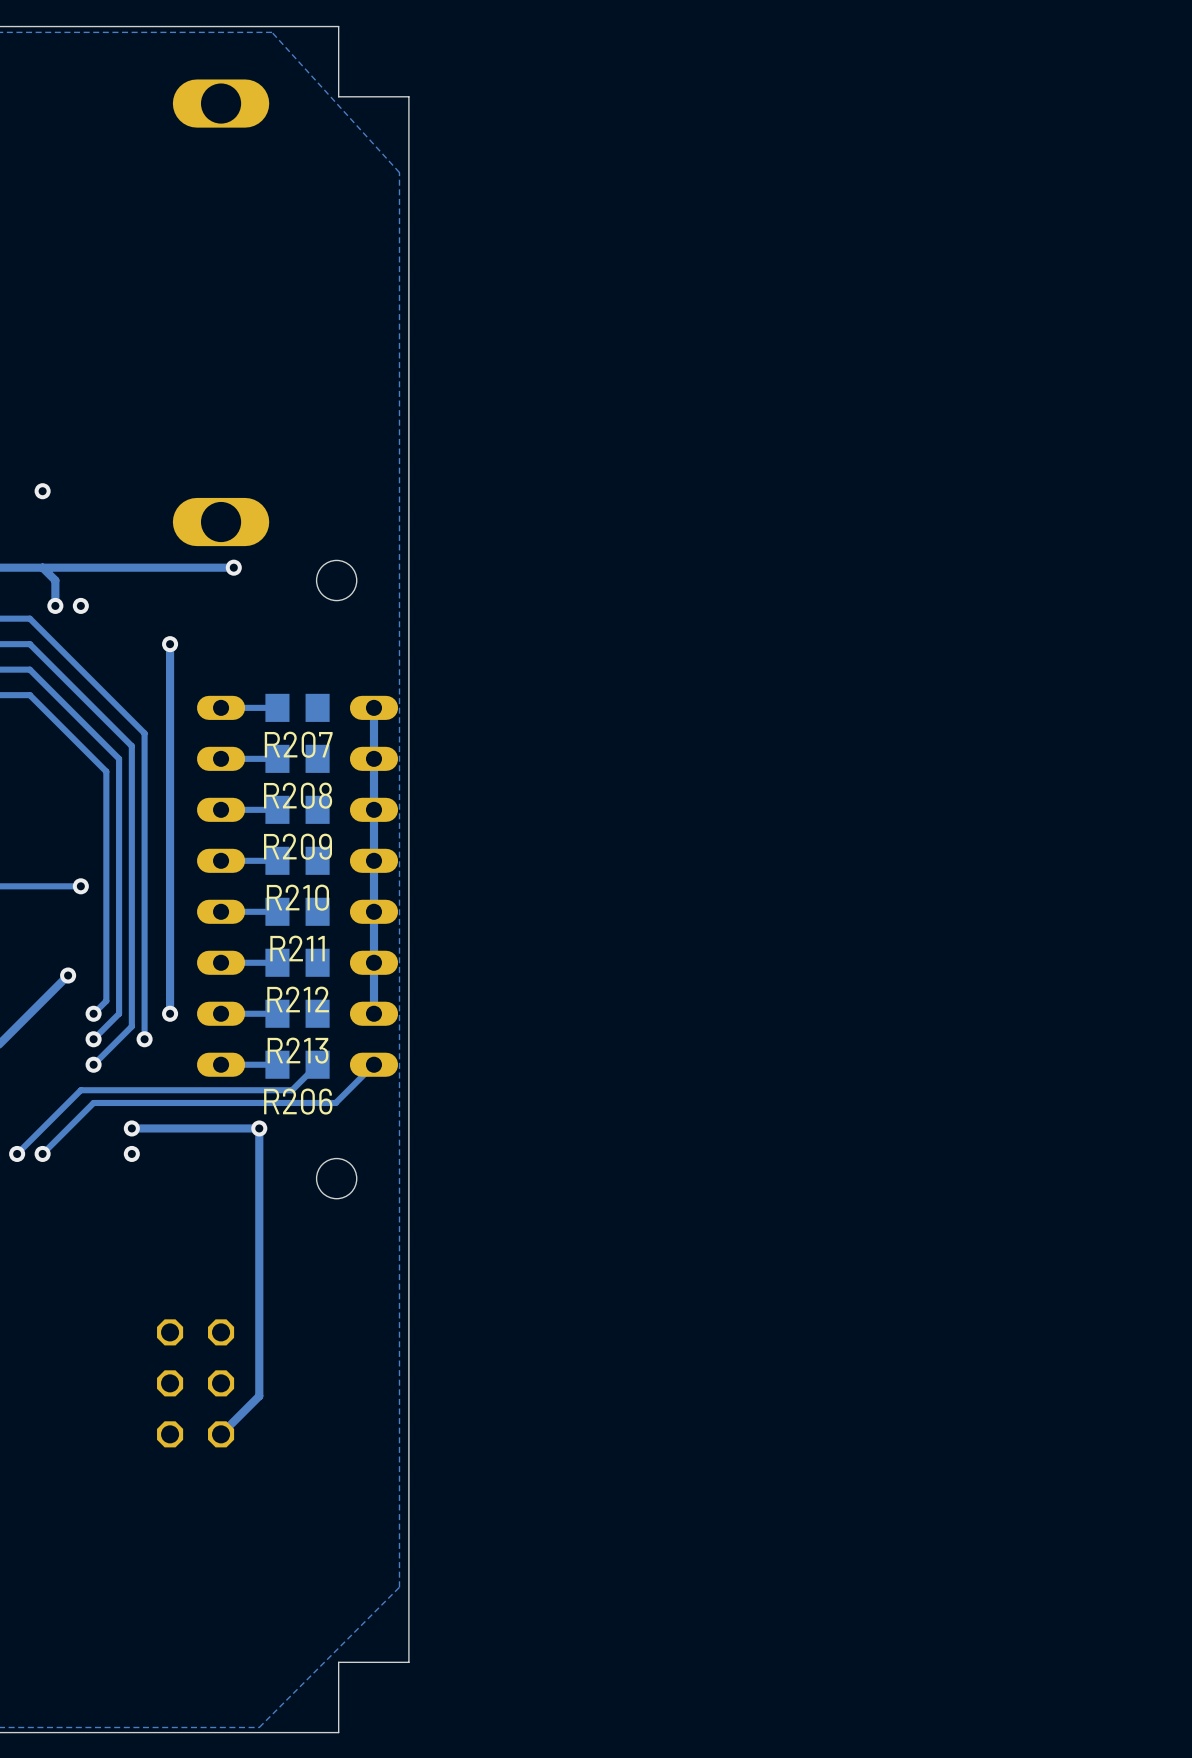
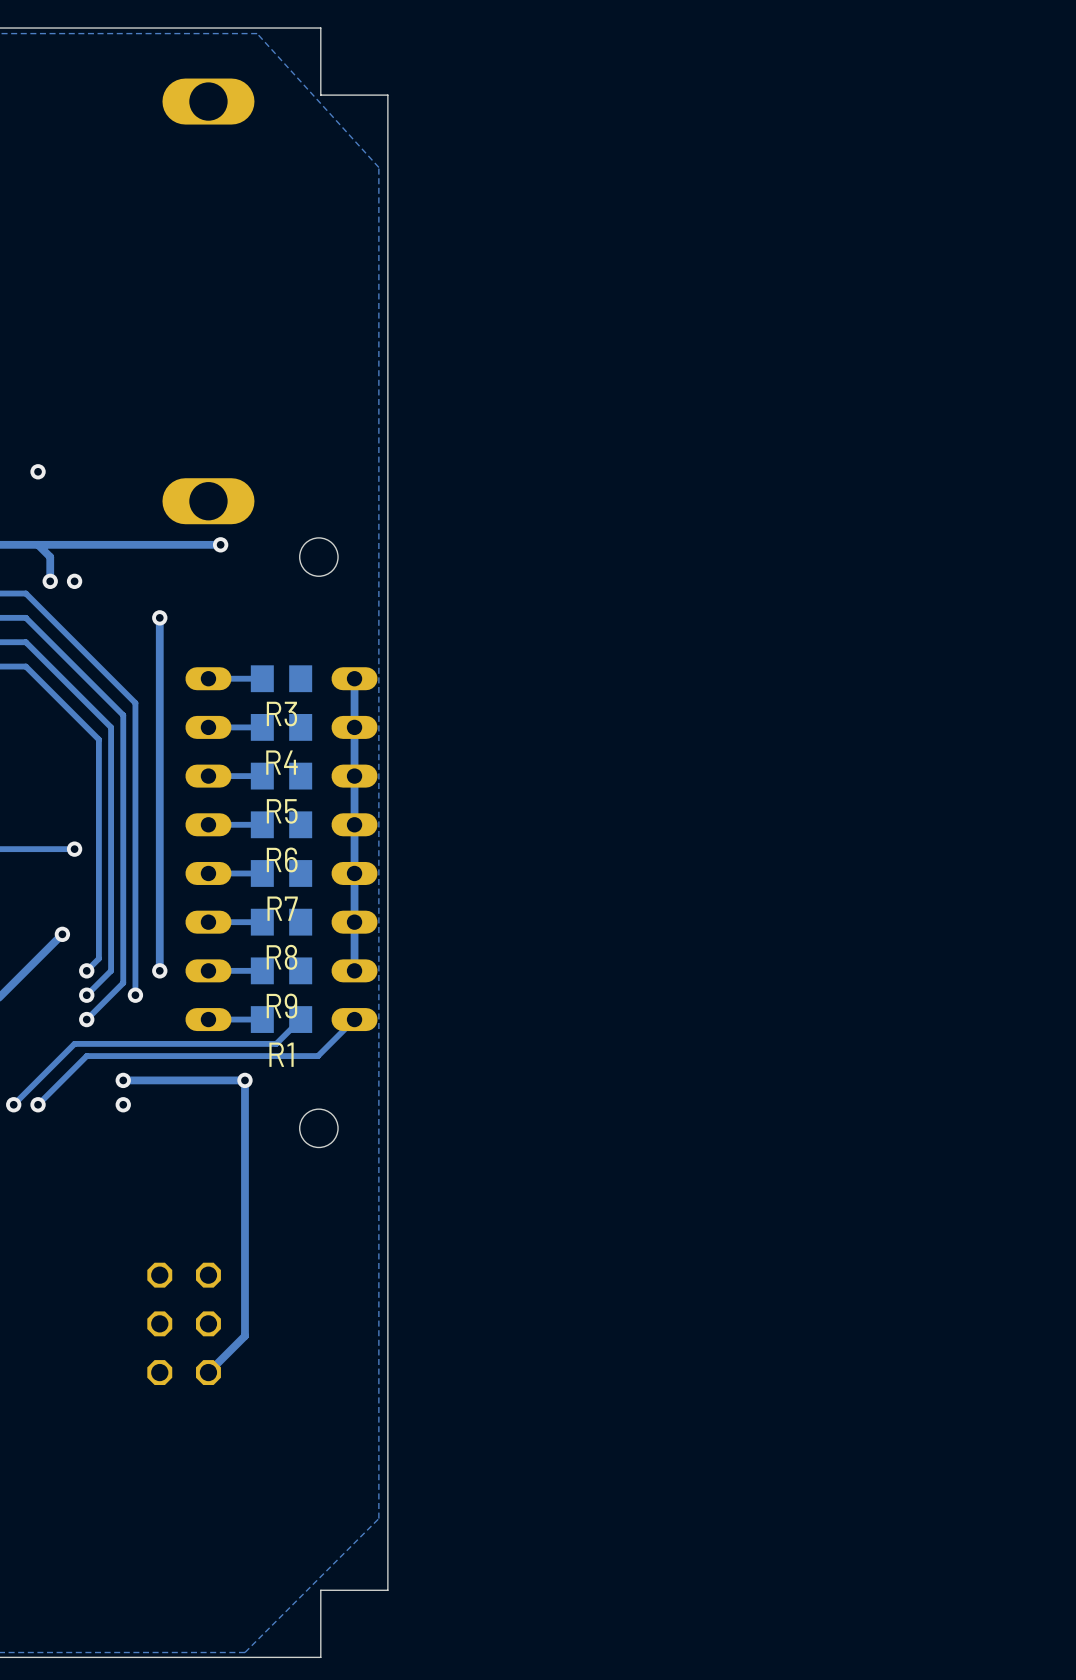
R207 name: R207 (298, 744) -> R3 (281, 714)
R208 name: R208 (298, 795) -> R4 (282, 762)
R209 name: R209 (298, 846) -> R5 (282, 811)
R210 name: R210 (297, 897) -> R6 (282, 859)
R211 name: R211 (297, 948) -> R7 (282, 908)
R212 name: R212 (298, 999) -> R8 (282, 957)
R213 name: R213 (298, 1050) -> R9 (281, 1006)
R206 name: R206 (298, 1101) -> R1 (281, 1054)

